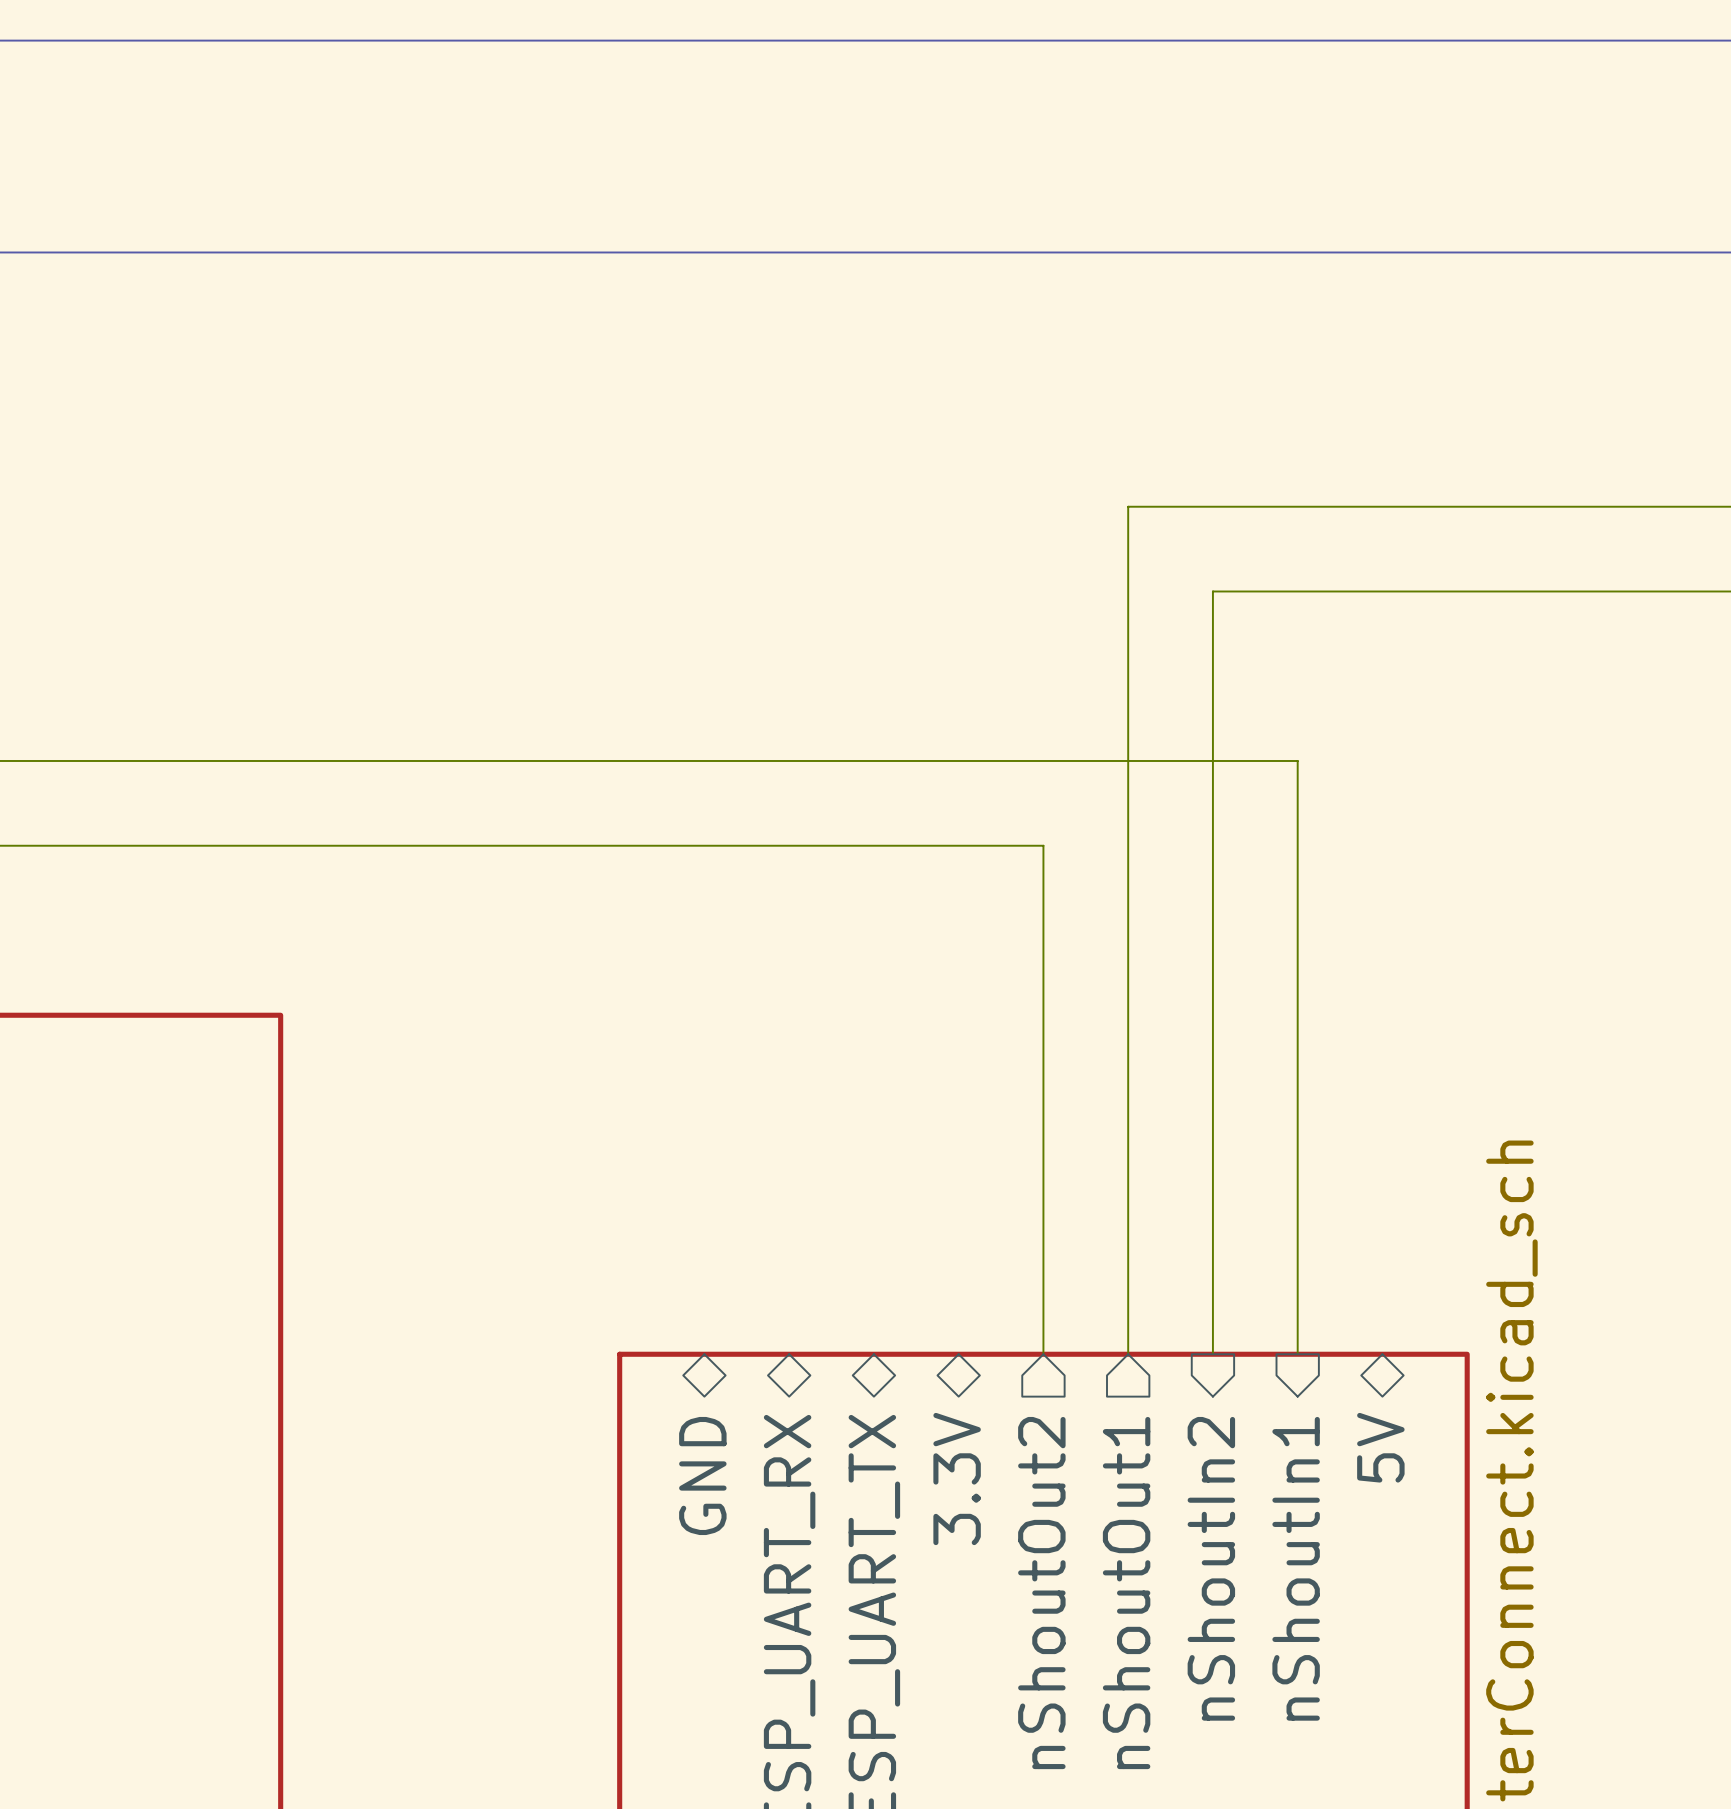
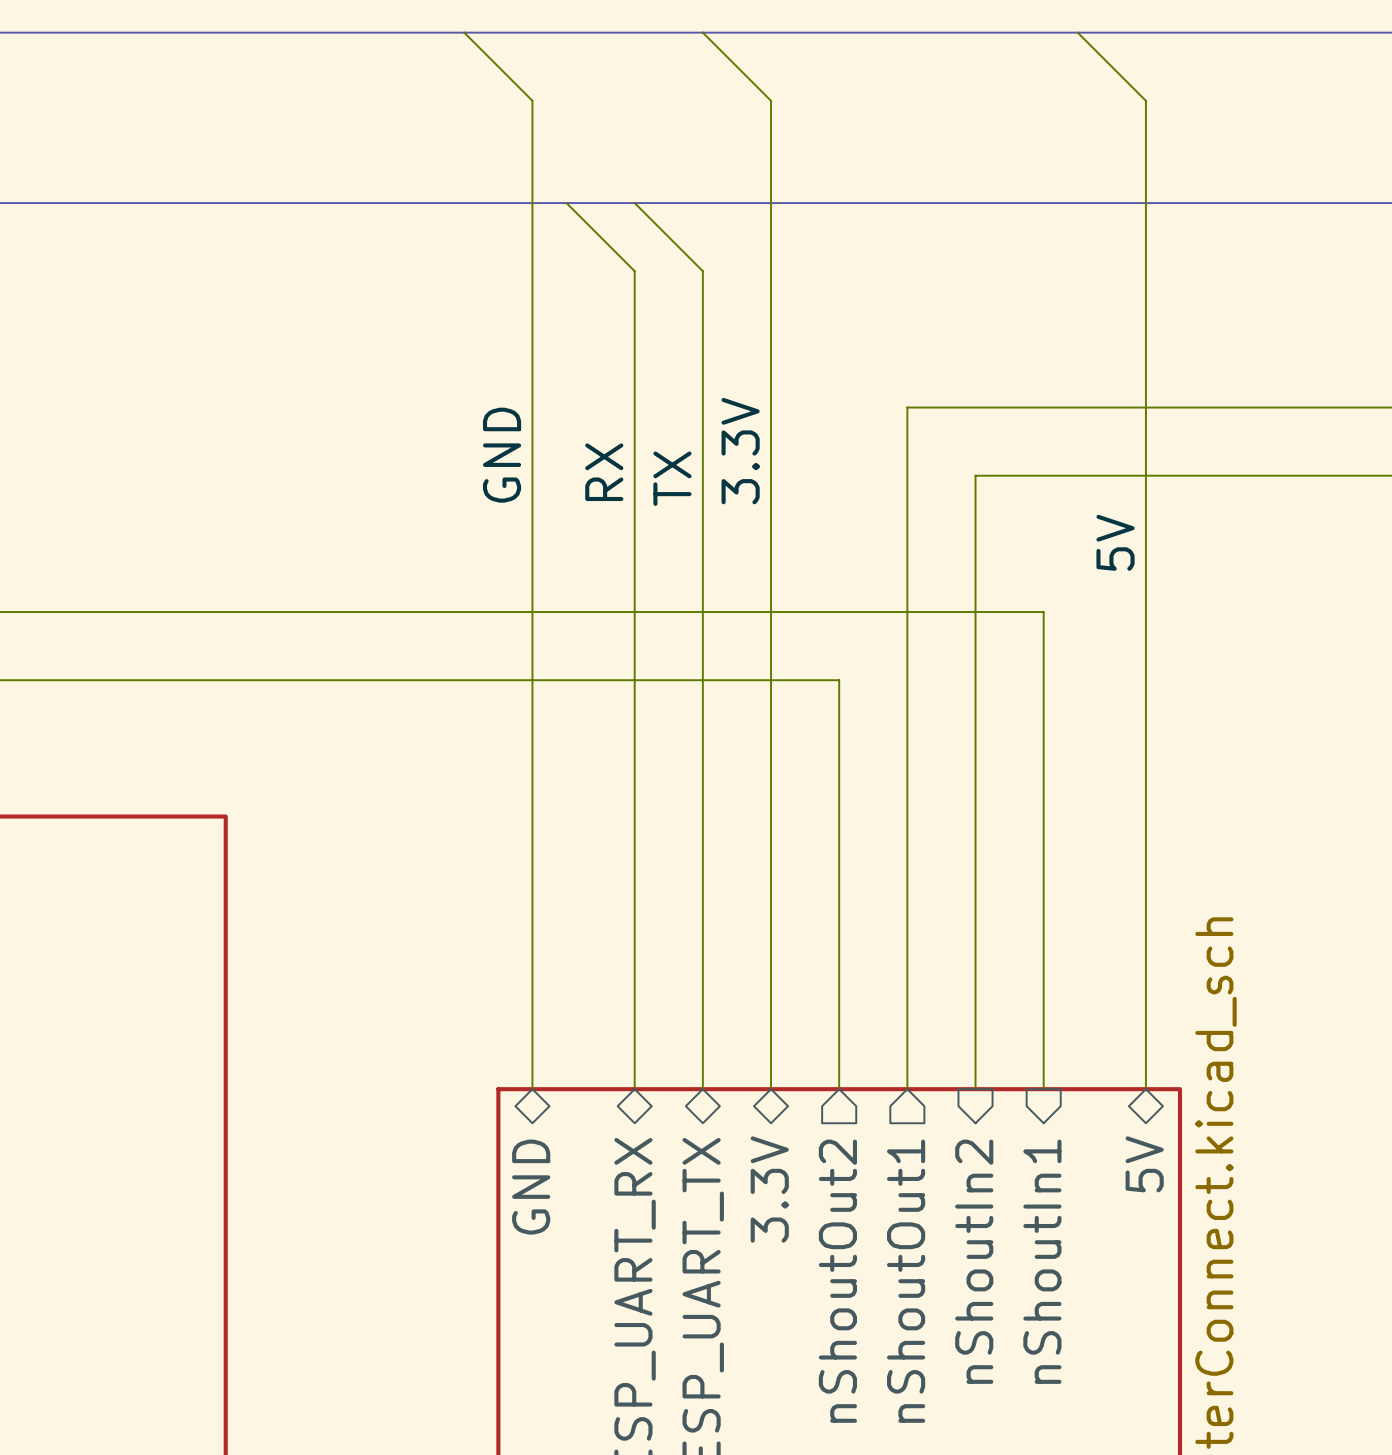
wire: none -> (464, 32) (532, 100) (532, 1089)
wire: none -> (702, 32) (771, 100) (771, 1089)
wire: none -> (1077, 32) (1145, 100) (1145, 1089)
wire: none -> (566, 203) (634, 271) (634, 1089)
wire: none -> (634, 203) (702, 271) (702, 1089)
label: none -> 3.3V (740, 451)
label: none -> GND (502, 455)
label: none -> RX (604, 472)
label: none -> TX (672, 478)
label: none -> 5V (1115, 542)
sheet pin position: 5V (1380, 1447) -> 5V (1144, 1164)
sheet pin position: GND (702, 1475) -> GND (531, 1187)

